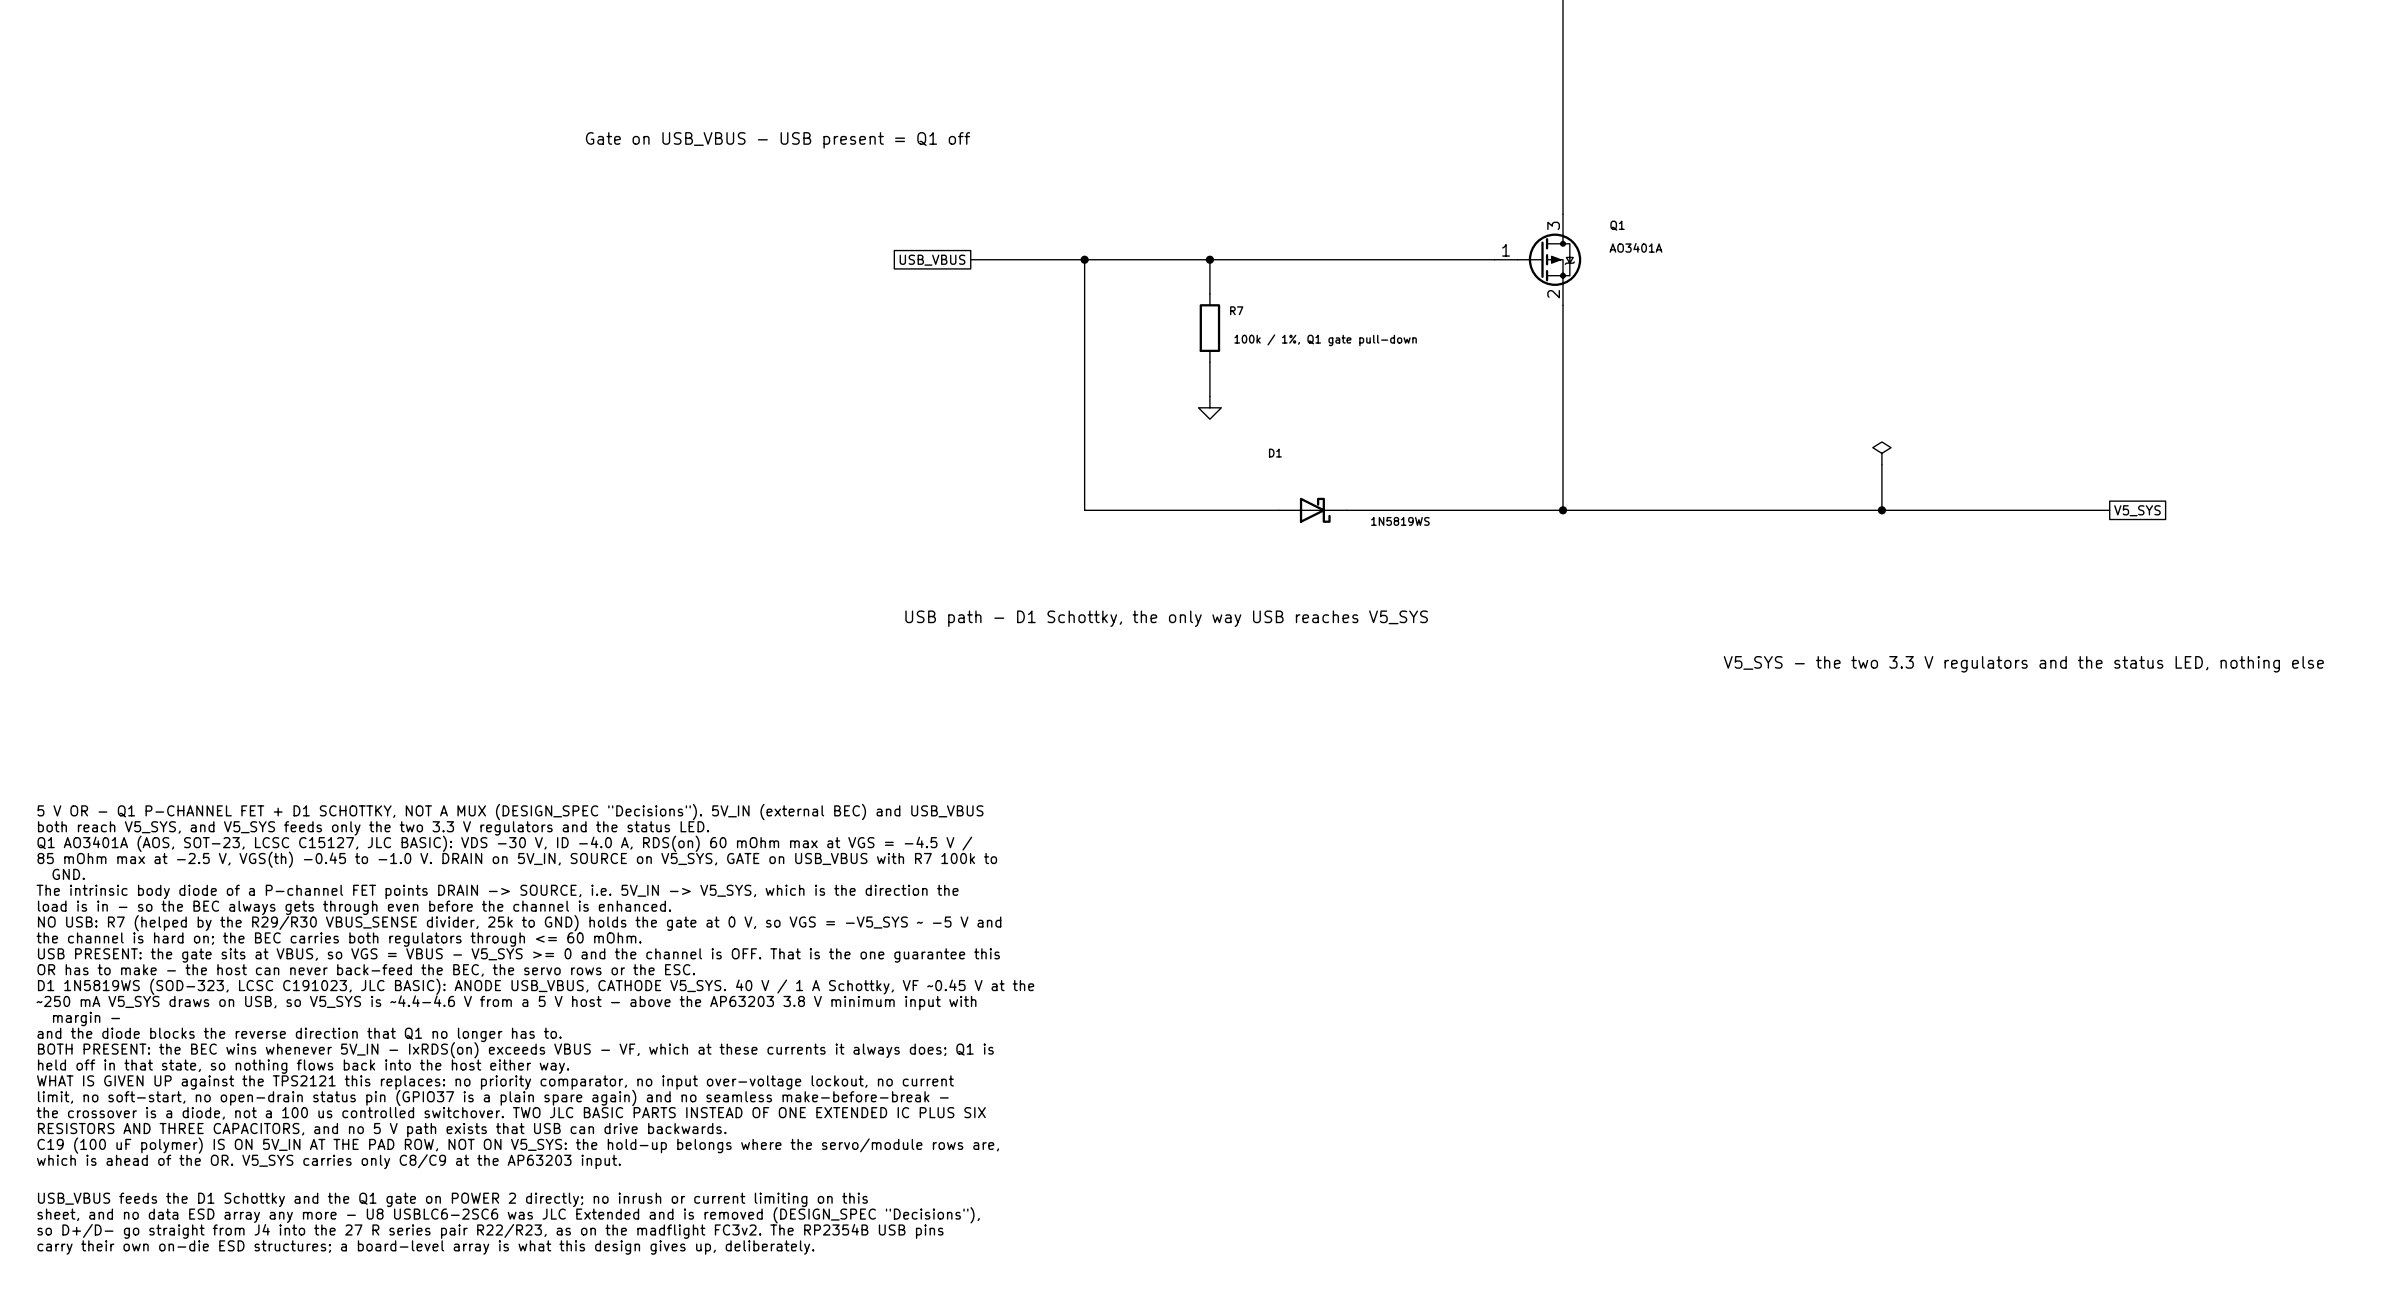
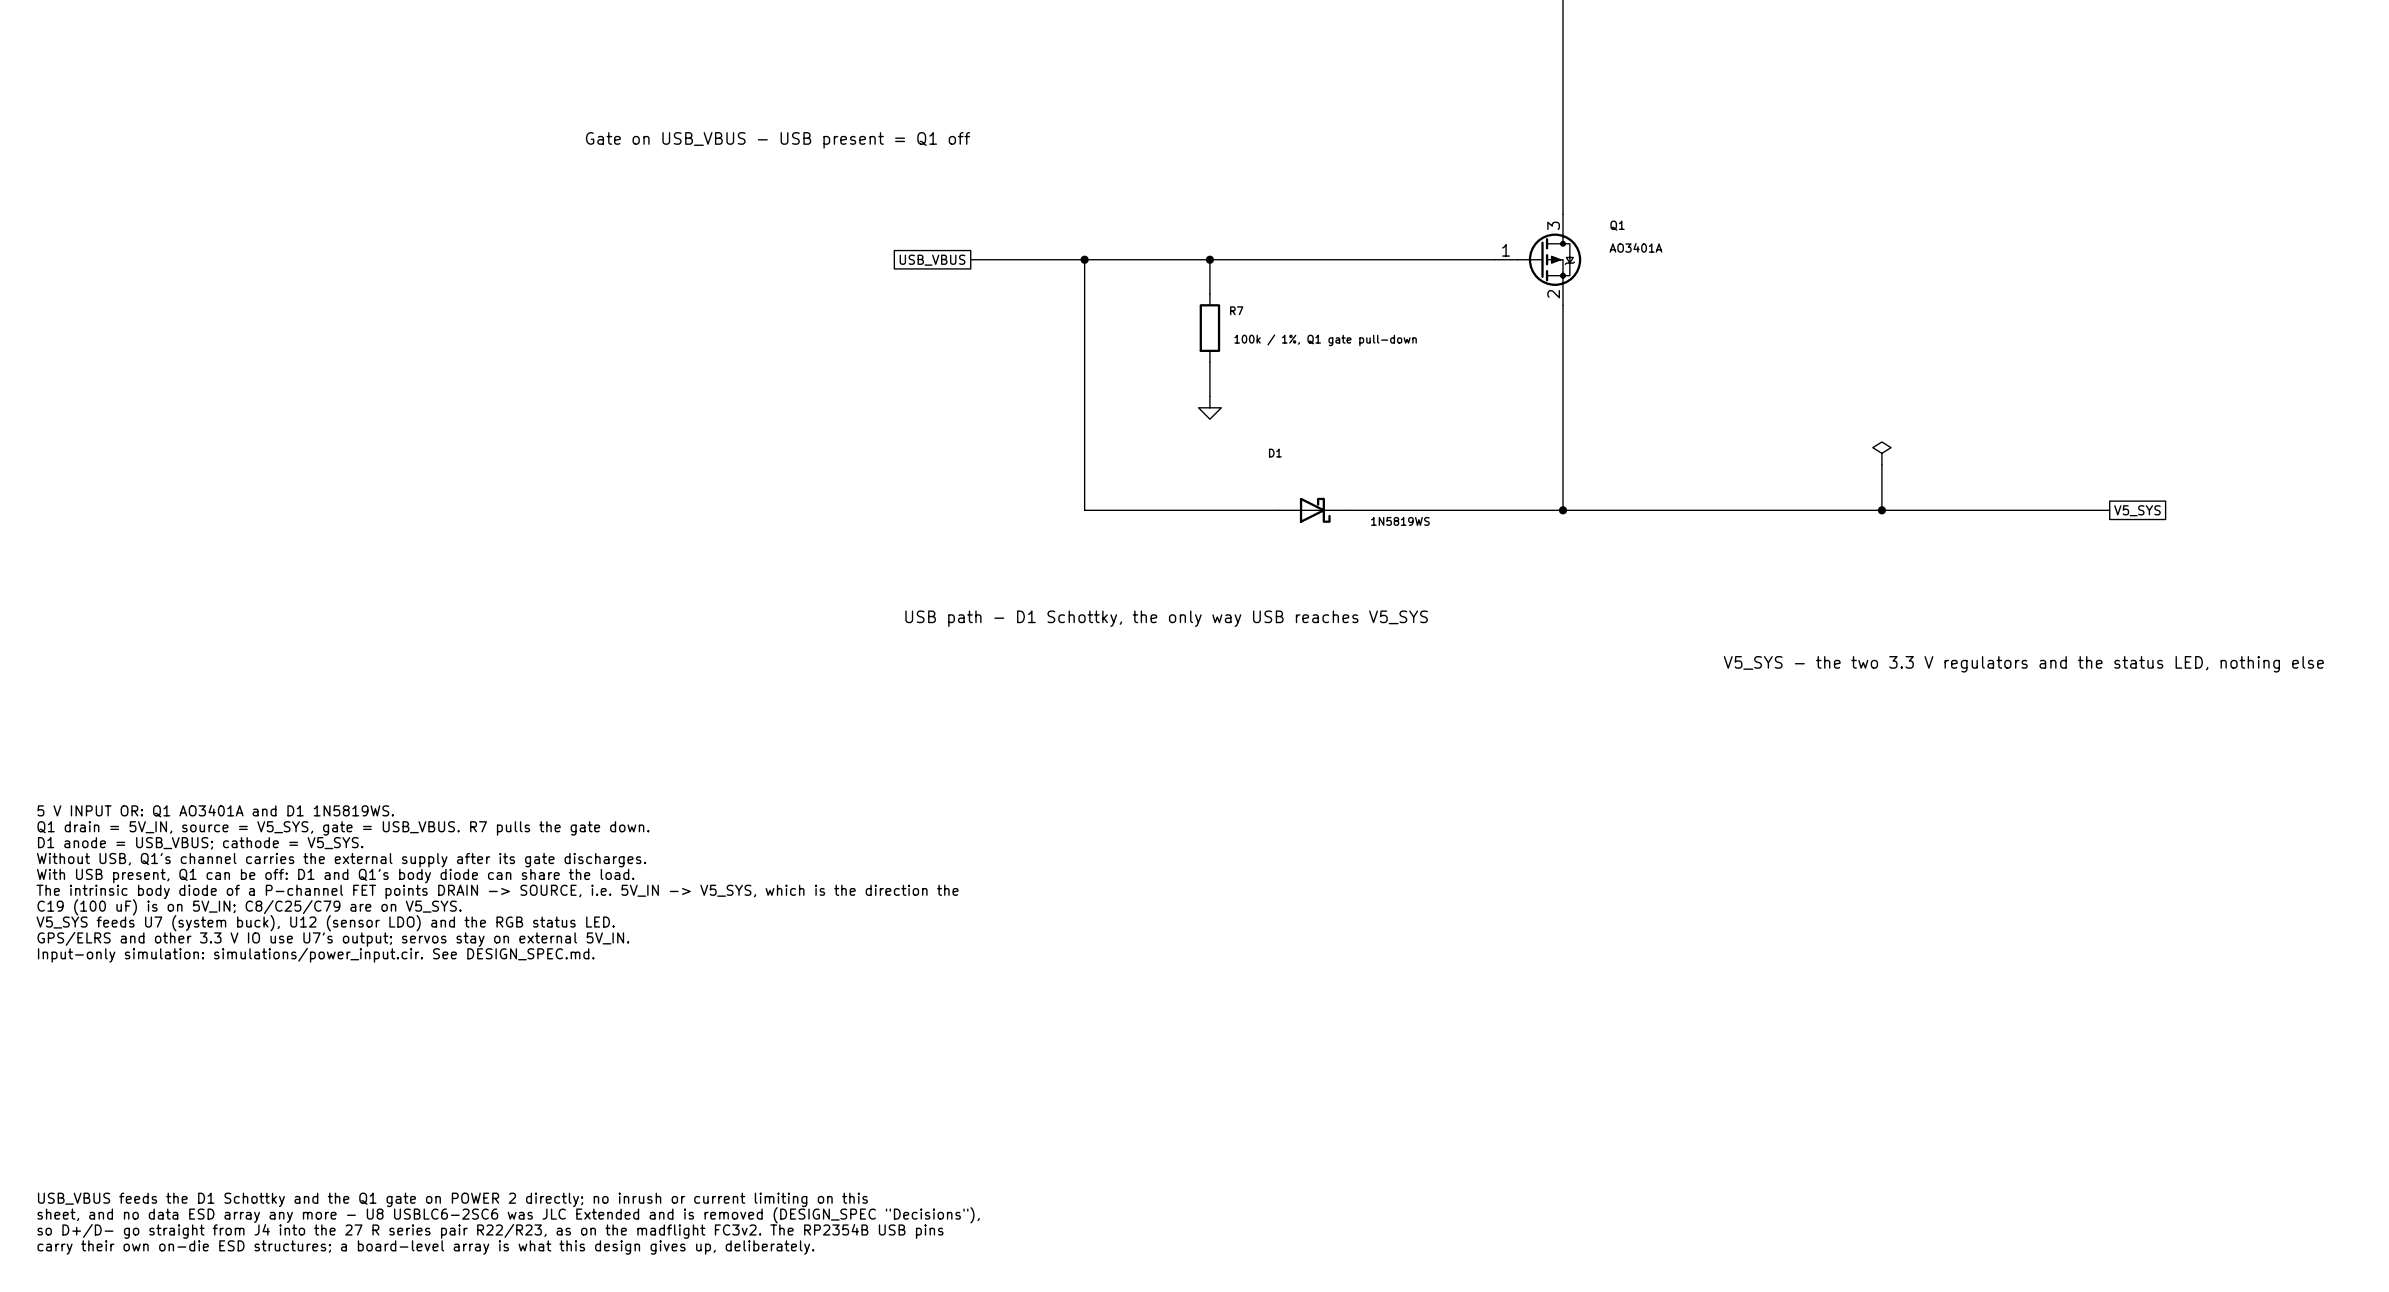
text: 5 V OR - Q1 P-CHANNEL FET + D1 SCHOTTKY, NOT A MUX (DESIGN_SPEC "Decisions"). 5V_IN (external BEC) and USB_VBUS (510, 812) -> 5 V INPUT OR: Q1 AO3401A and D1 1N5819WS. (215, 811)
text: both reach V5_SYS, and V5_SYS feeds only the two 3.3 V regulators and the status LED. (373, 828) -> Q1 drain = 5V_IN, source = V5_SYS, gate = USB_VBUS. R7 pulls the gate down. (343, 828)
text: Q1 AO3401A (AOS, SOT-23, LCSC C15127, JLC BASIC): VDS -30 V, ID -4.0 A, RDS(on) 60 mOhm max at VGS = -4.5 V / (504, 843) -> D1 anode = USB_VBUS; cathode = V5_SYS. (200, 843)
text: 85 mOhm max at -2.5 V, VGS(th) -0.45 to -1.0 V. DRAIN on 5V_IN, SOURCE on V5_SYS, GATE on USB_VBUS with R7 100k to (517, 859) -> Without USB, Q1's channel carries the external supply after its gate discharges. (341, 860)
text: GND. (68, 874) -> With USB present, Q1 can be off: D1 and Q1's body diode can share the load. (335, 876)
text: load is in - so the BEC always gets through even before the channel is enhanced. (354, 907) -> C19 (100 uF) is on 5V_IN; C8/C25/C79 are on V5_SYS. (249, 907)
text: NO USB: R7 (helped by the R29/R30 VBUS_SENSE divider, 25k to GND) holds the gate at 0 V, so VGS = -V5_SYS ~ -5 V and (519, 923) -> V5_SYS feeds U7 (system buck), U12 (sensor LDO) and the RGB status LED. (325, 923)
text: the channel is hard on; the BEC carries both regulators through <= 60 mOhm. (339, 939) -> GPS/ELRS and other 3.3 V IO use U7's output; servos stay on external 5V_IN. (333, 939)
text: USB PRESENT: the gate sits at VBUS, so VGS = VBUS - V5_SYS >= 0 and the channel is OFF. That is the one guarantee this (518, 955) -> Input-only simulation: simulations/power_input.cir. See DESIGN_SPEC.md. (316, 955)
text: OR has to make - the host can never back-feed the BEC, the servo rows or the ESC. (366, 970) -> none
text: D1 1N5819WS (SOD-323, LCSC C191023, JLC BASIC): ANODE USB_VBUS, CATHODE V5_SYS. 40 V / 1 A Schottky, VF ~0.45 V at the (536, 986) -> none
text: ~250 mA V5_SYS draws on USB, so V5_SYS is ~4.4-4.6 V from a 5 V host - above the AP63203 3.8 V minimum input with (506, 1002) -> none
text: margin - (86, 1018) -> none
text: and the diode blocks the reverse direction that Q1 no longer has to. (299, 1034) -> none
text: BOTH PRESENT: the BEC wins whenever 5V_IN - IxRDS(on) exceeds VBUS - VF, which at these currents it always does; Q1 is (515, 1050) -> none
text: held off in that state, so nothing flows back into the host either way. (303, 1066) -> none
text: WHAT IS GIVEN UP against the TPS2121 this replaces: no priority comparator, no input over-voltage lockout, no current (495, 1082) -> none
text: limit, no soft-start, no open-drain status pin (GPIO37 is a plain spare again) and no seamless make-before-break - (493, 1097) -> none
text: the crossover is a diode, not a 100 us controlled switchover. TWO JLC BASIC PARTS INSTEAD OF ONE EXTENDED IC PLUS SIX (511, 1113) -> none
text: RESISTORS AND THREE CAPACITORS, and no 5 V path exists that USB can drive backwards. (382, 1130) -> none
text: C19 (100 uF polymer) IS ON 5V_IN AT THE PAD ROW, NOT ON V5_SYS: the hold-up belongs where the servo/module rows are, (518, 1145) -> none
text: which is ahead of the OR. V5_SYS carries only C8/C9 at the AP63203 input. (328, 1161) -> none

